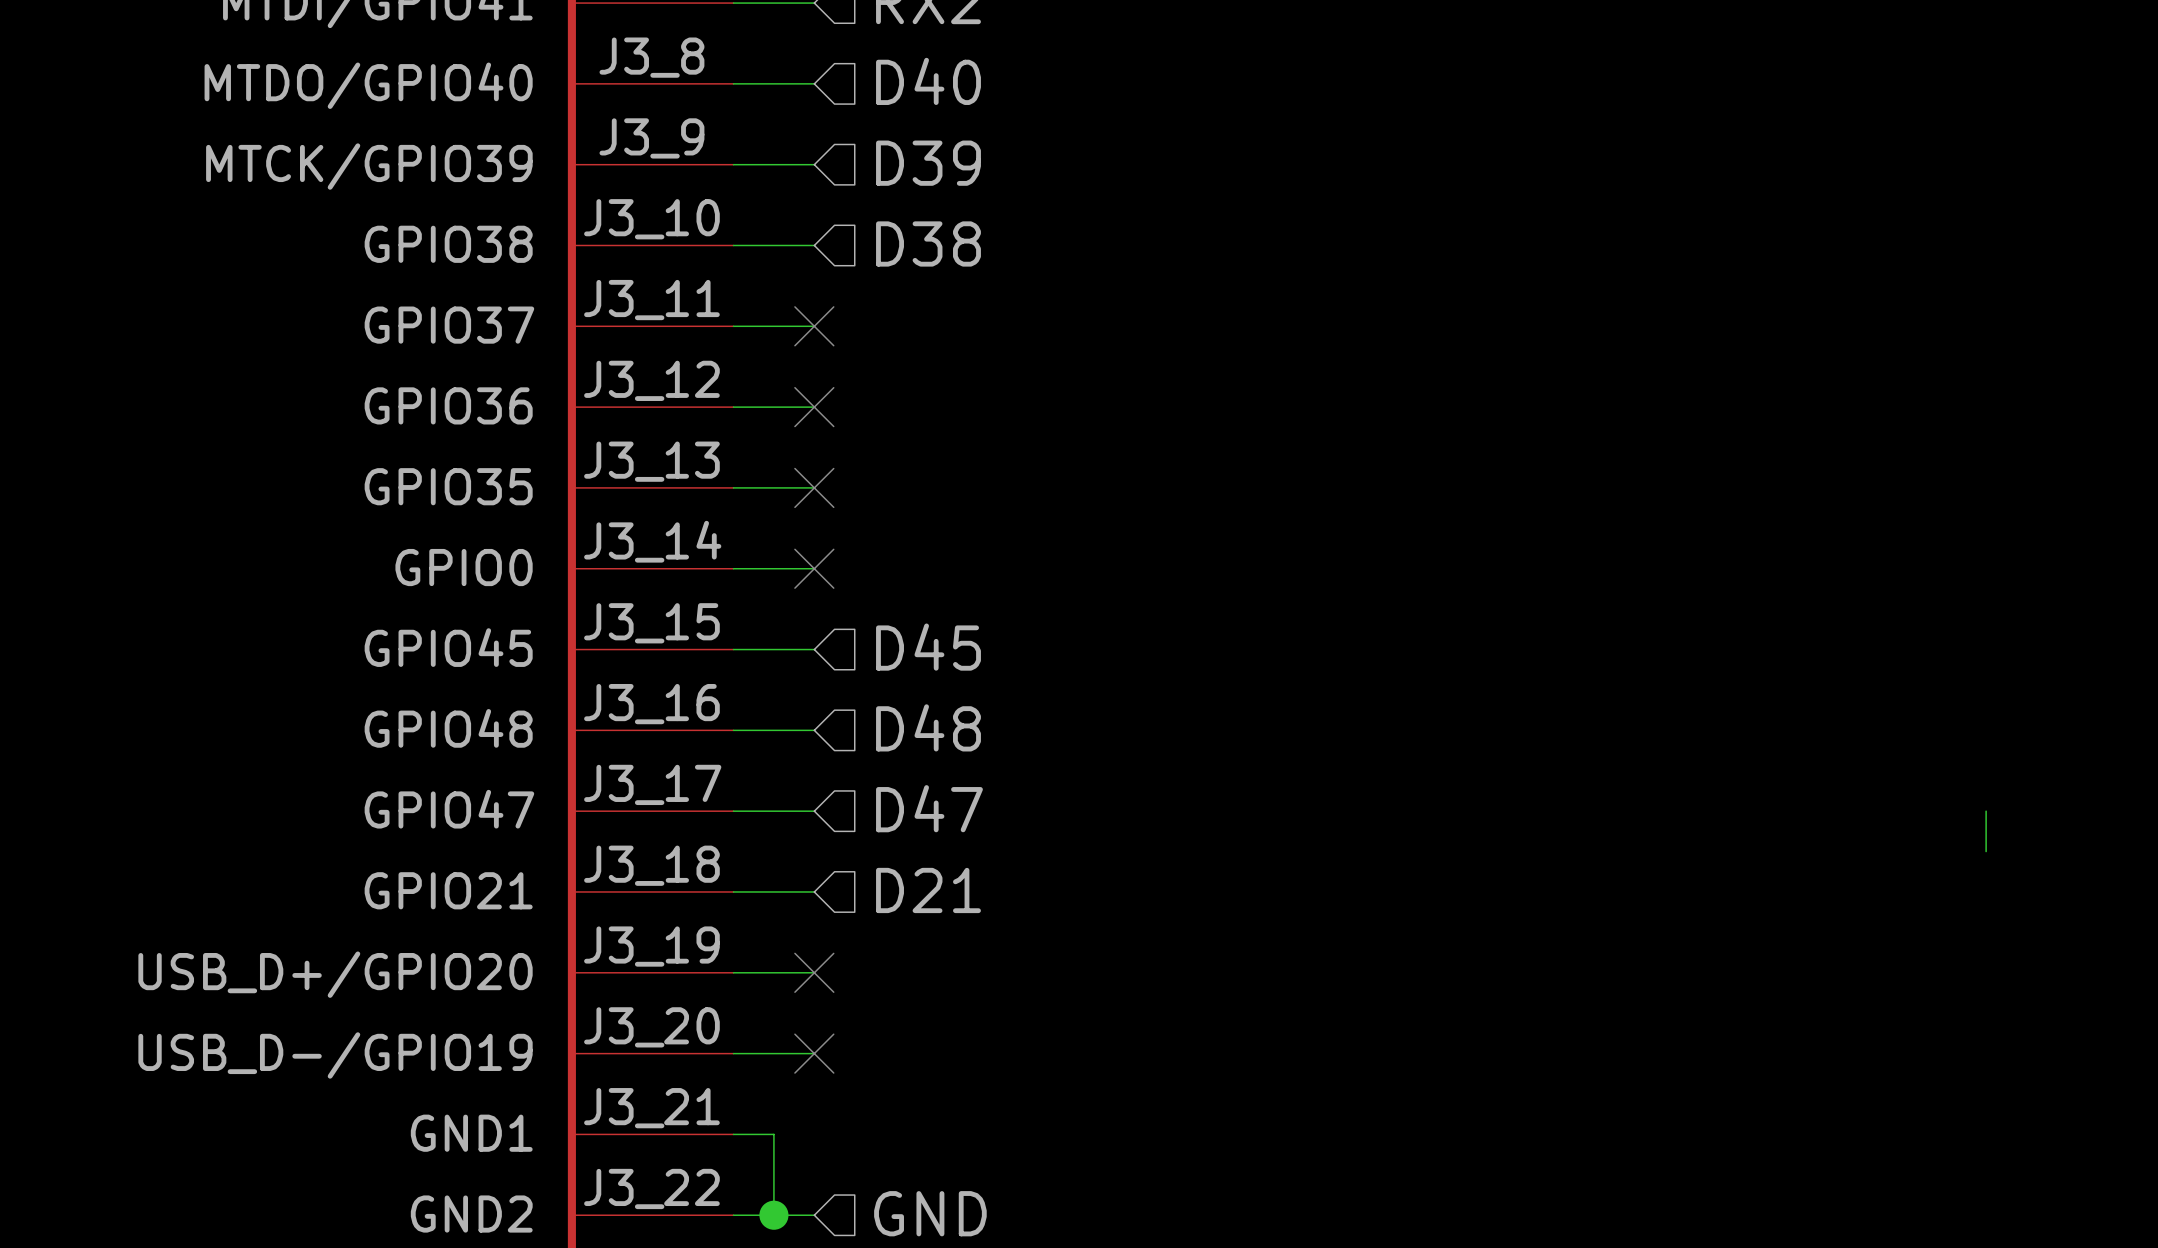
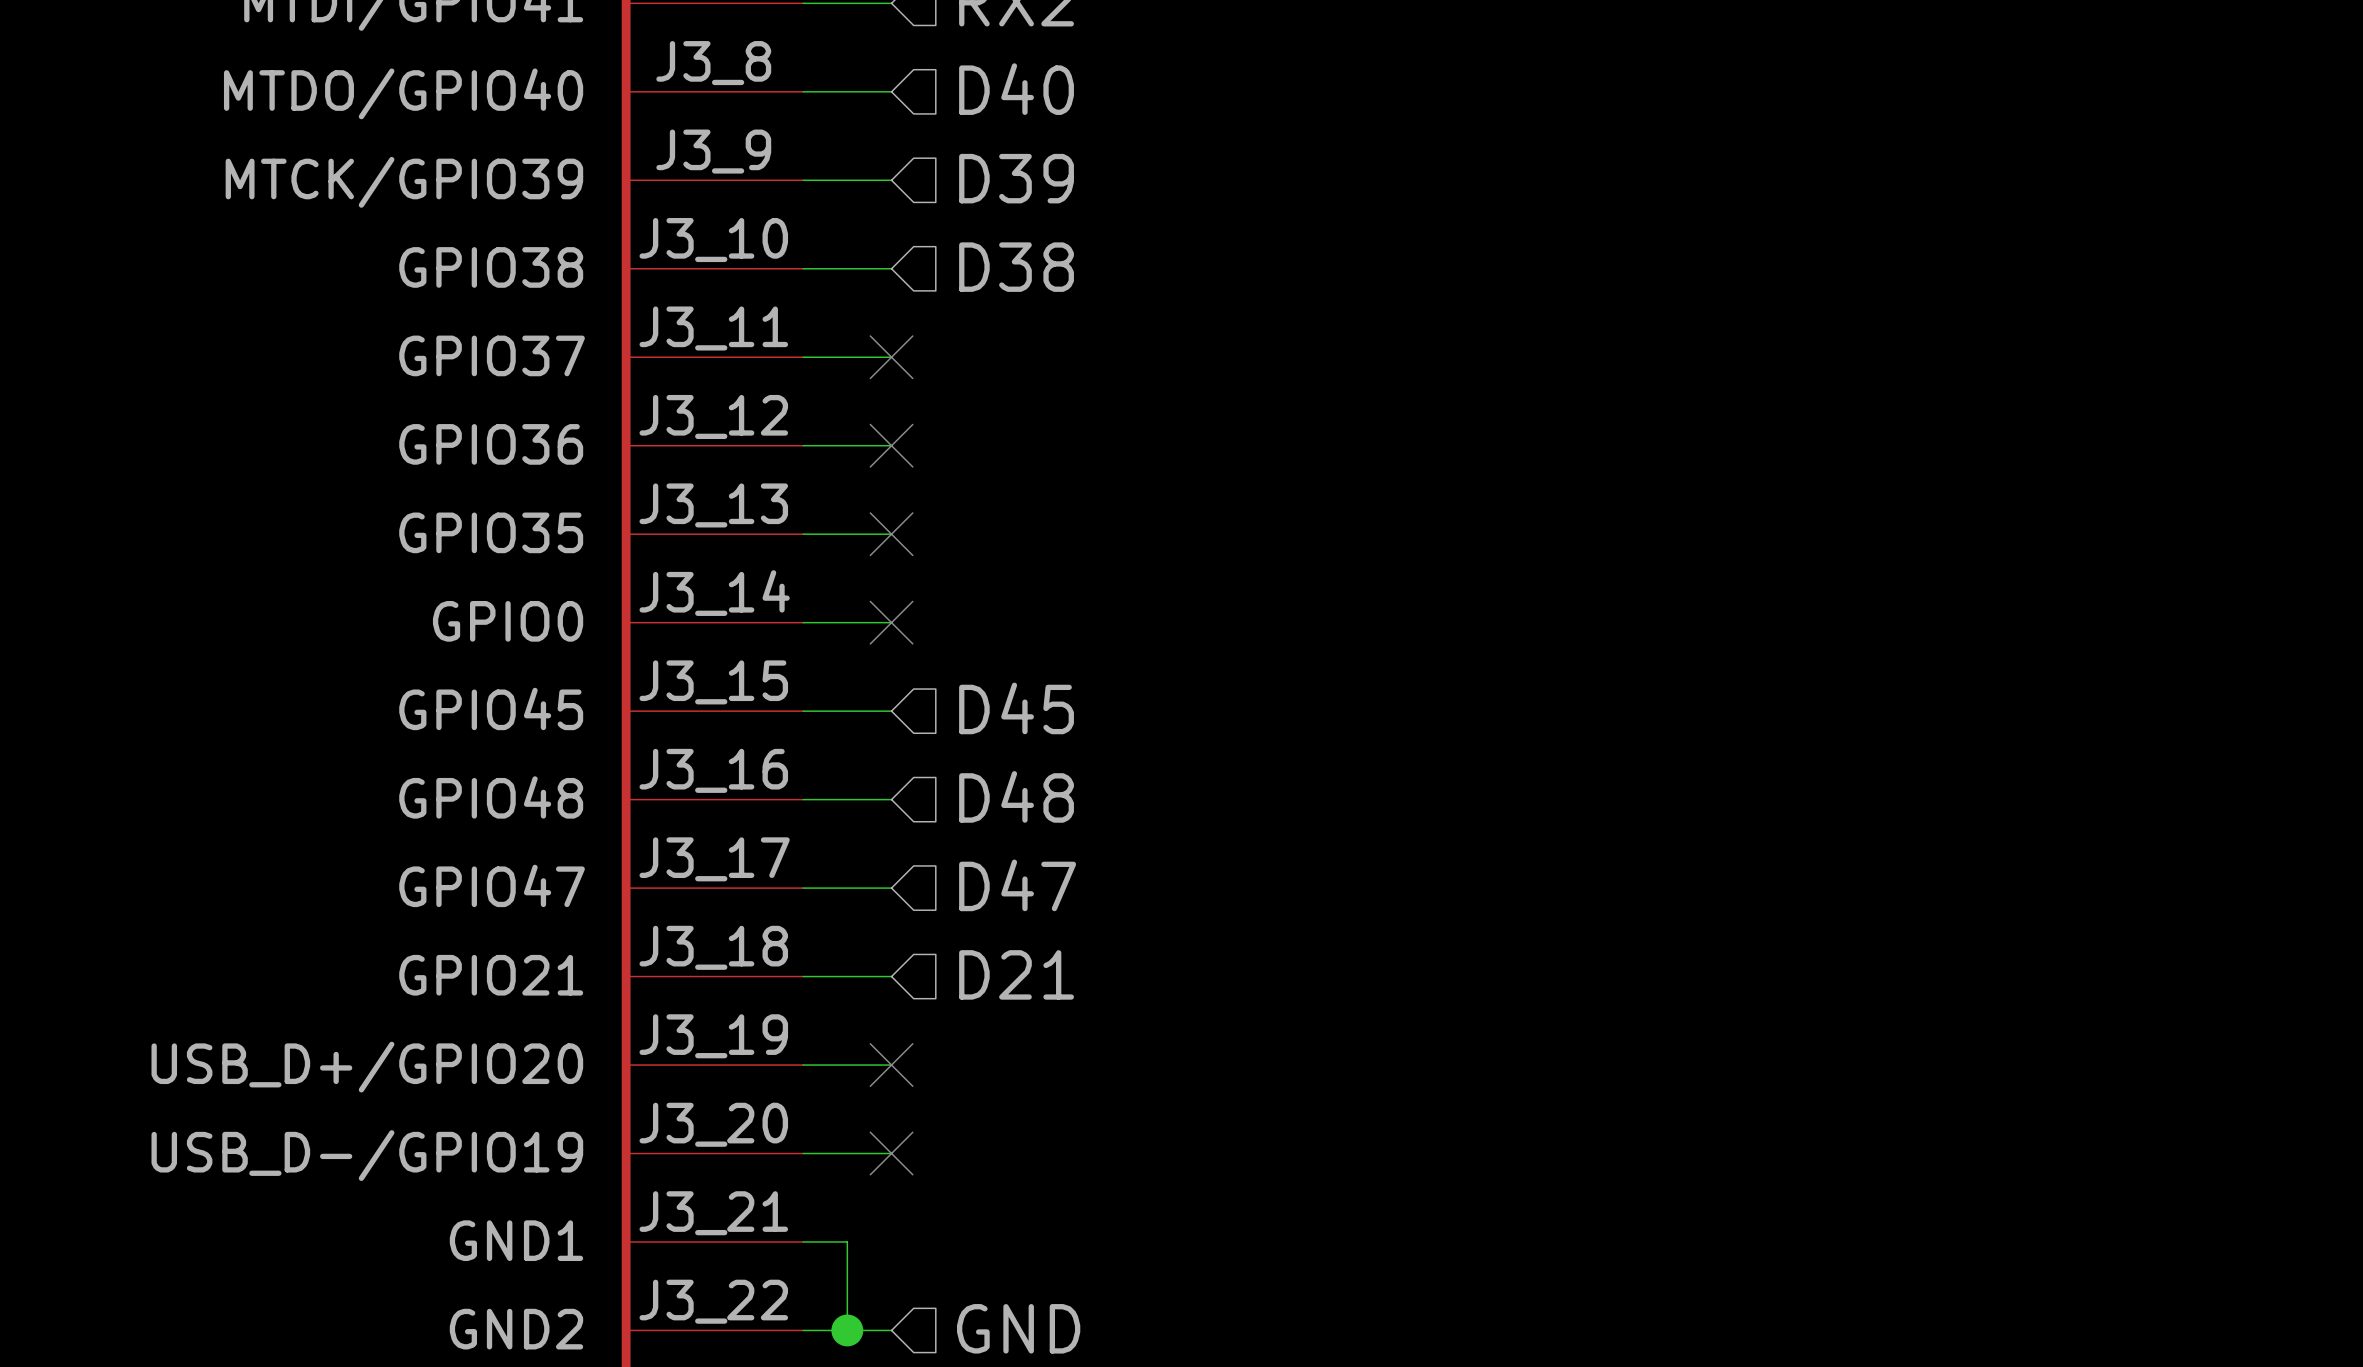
wire: (1986, 811) (1986, 851) -> none

